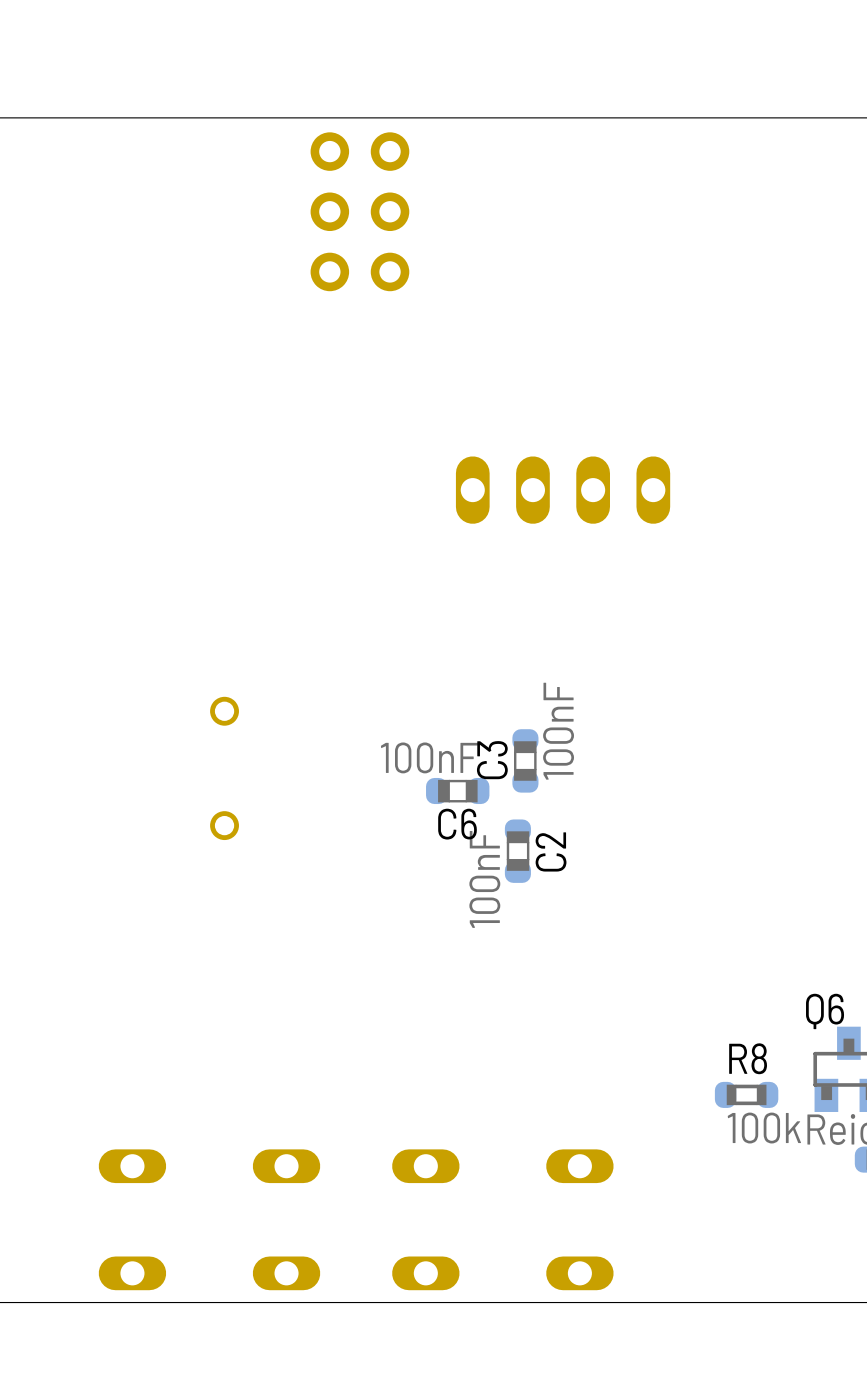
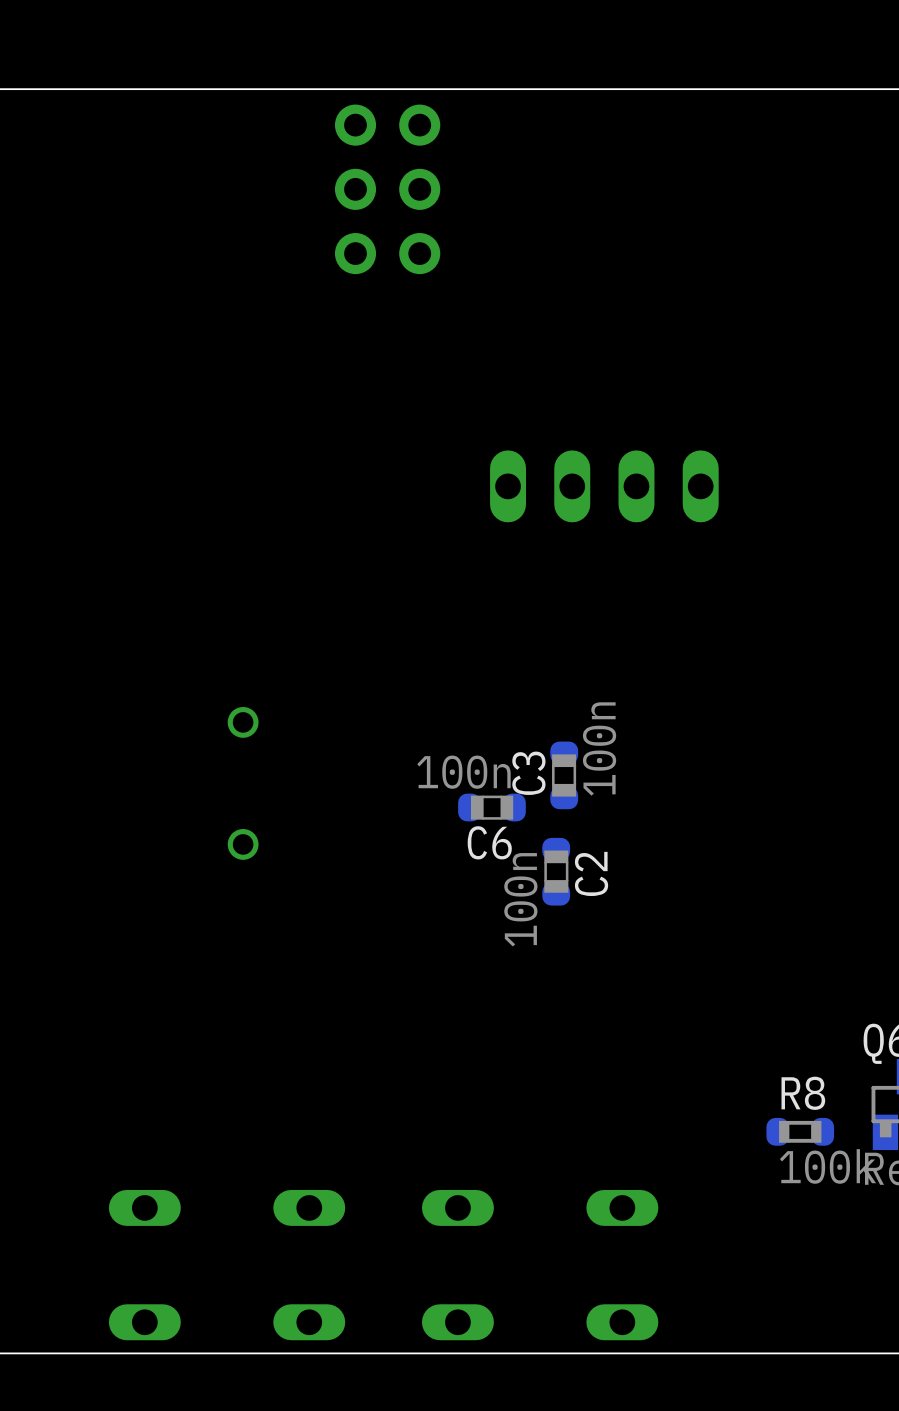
C3 value: 100nF (558, 731) -> 100n (599, 748)
C6 value: 100nF (429, 757) -> 100n (463, 772)
C2 value: 100nF (484, 879) -> 100n (520, 899)

